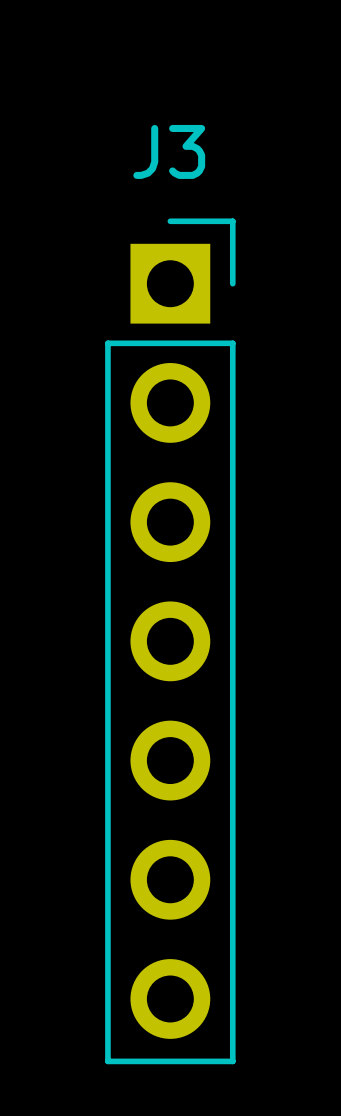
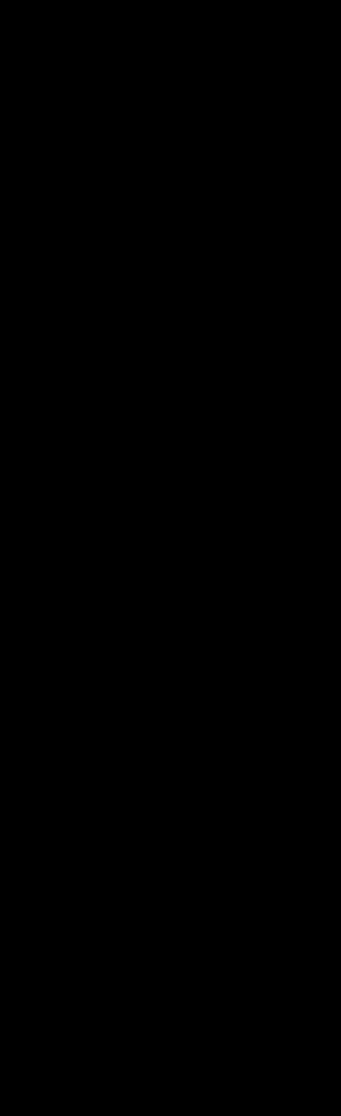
J3: (170, 641) -> none

